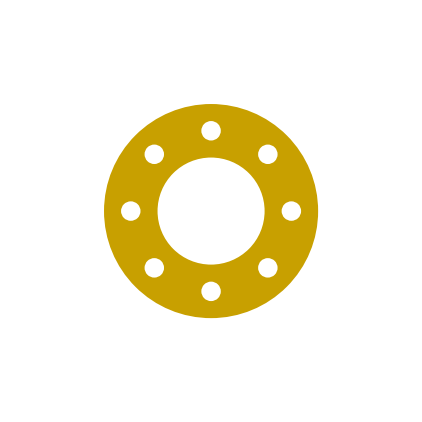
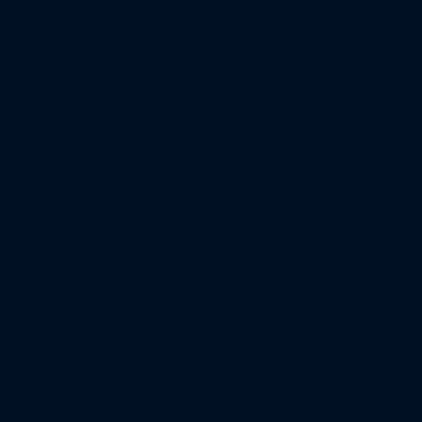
part: (211, 211) -> none

